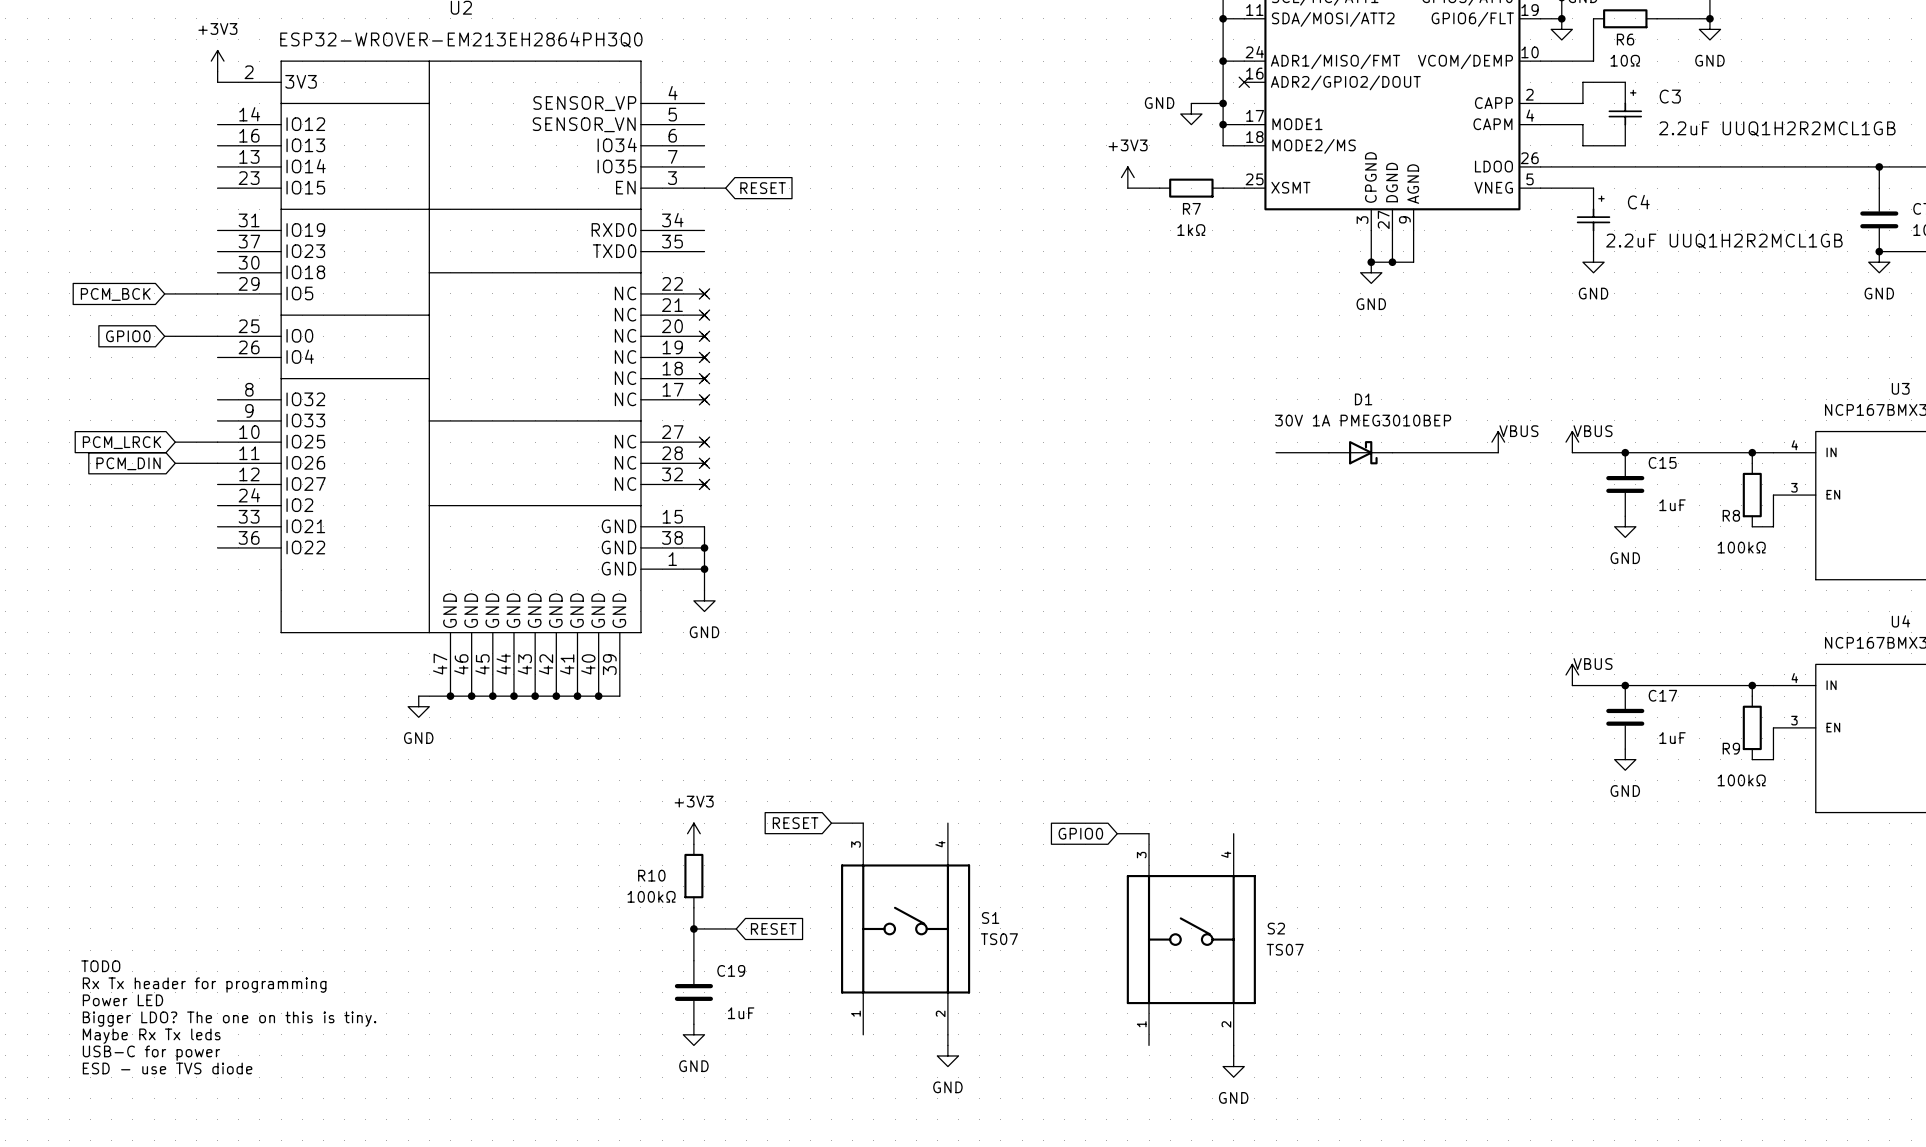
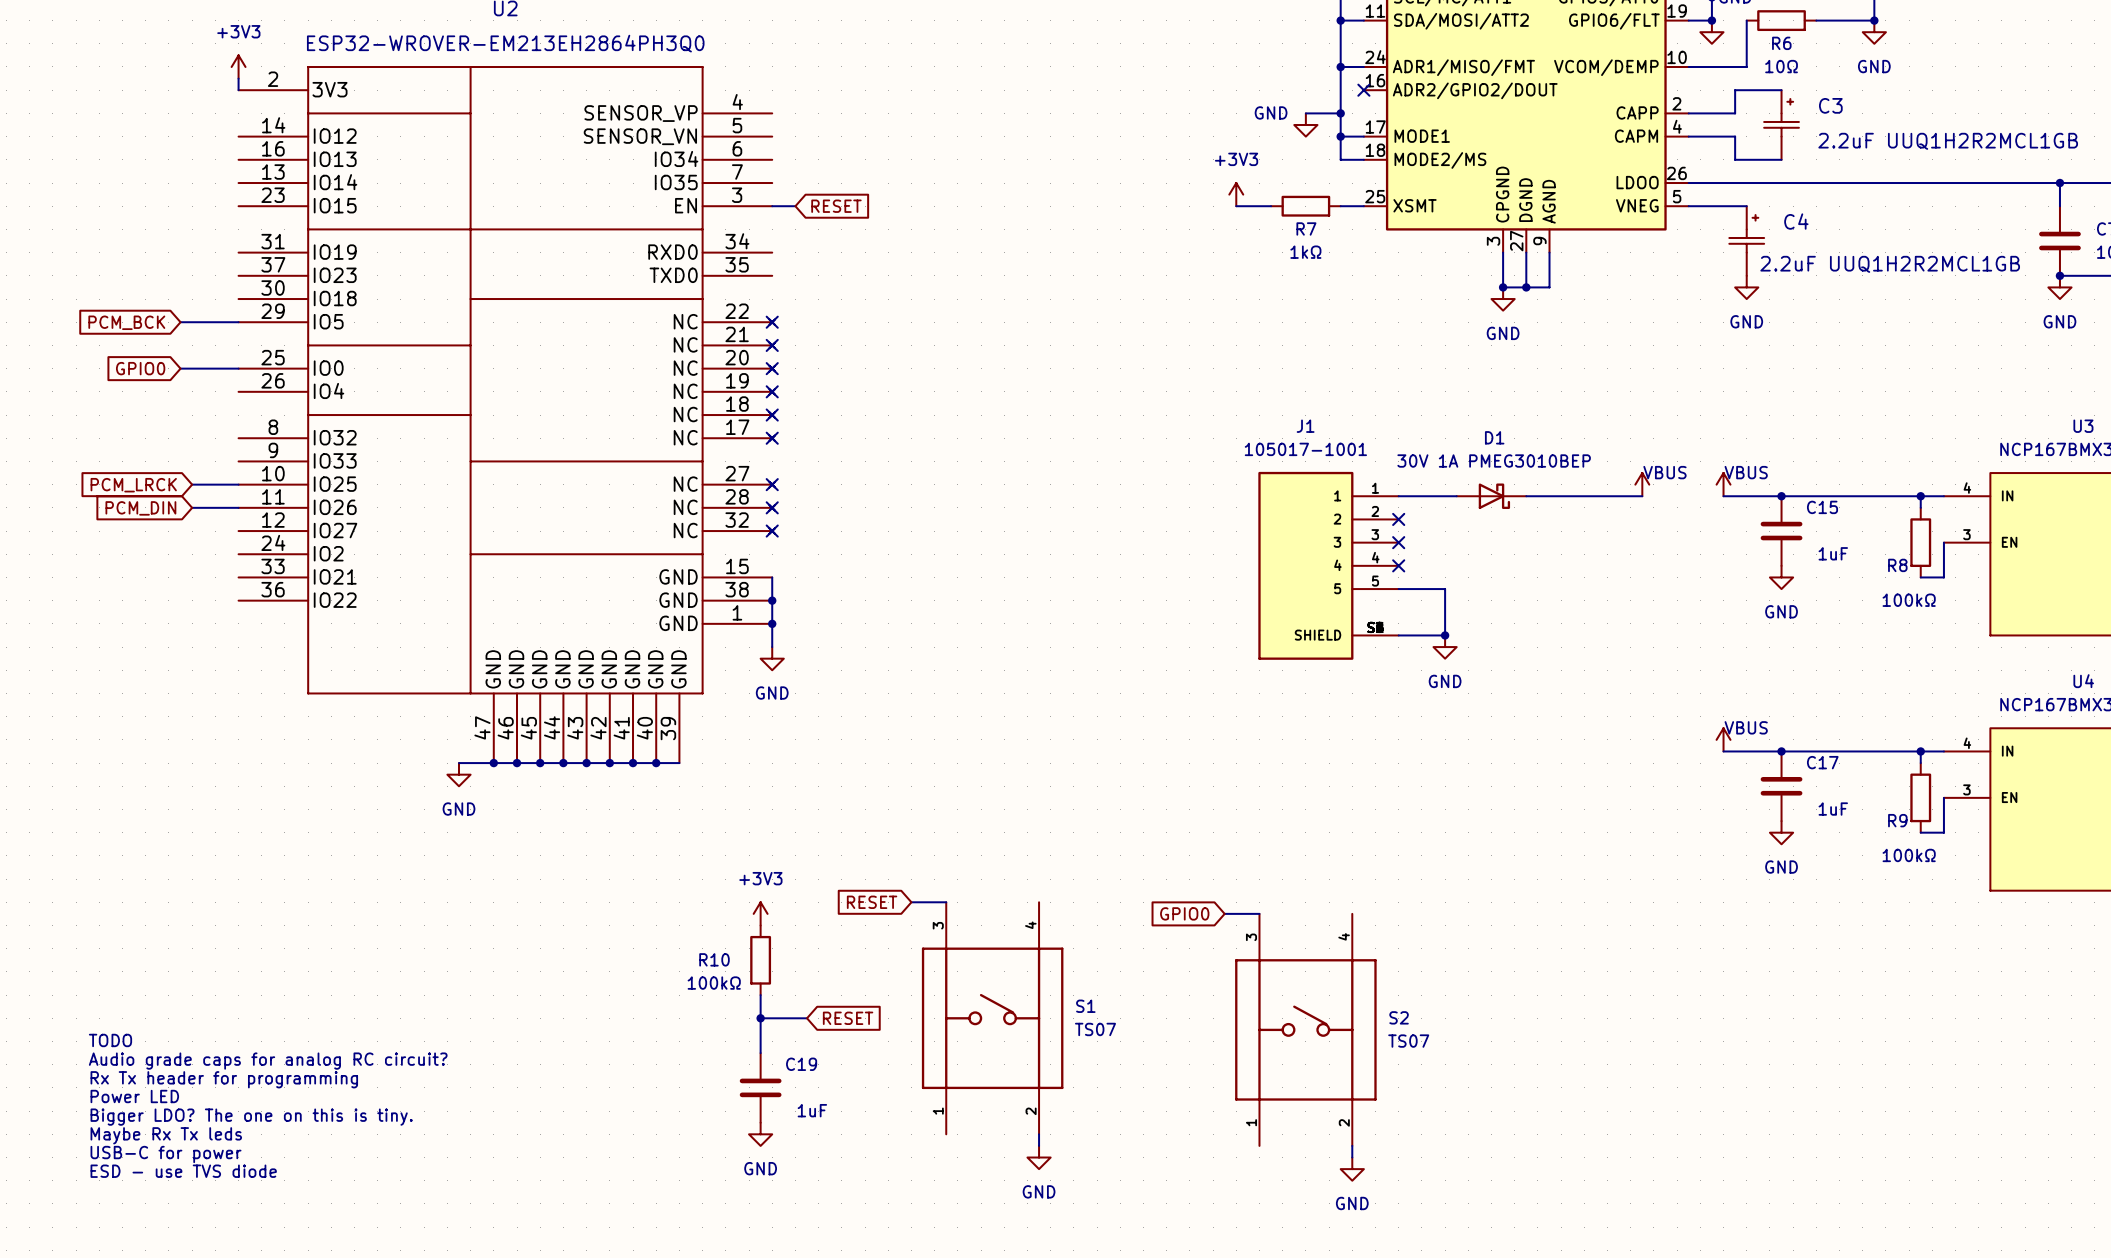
no-connect mark: none -> (1398, 519)
no-connect mark: none -> (1398, 542)
J1: none -> 105017-1001 (1328, 565)
no-connect mark: none -> (1398, 565)
wire: none -> (1398, 589) (1445, 589) (1445, 635) (1398, 635)
junction: none -> (1445, 635)
power symbol: none -> GND (1445, 647)
text: none -> TODO (110, 1040)
text: TODO (100, 966) -> Audio grade caps for analog RC circuit? (268, 1061)

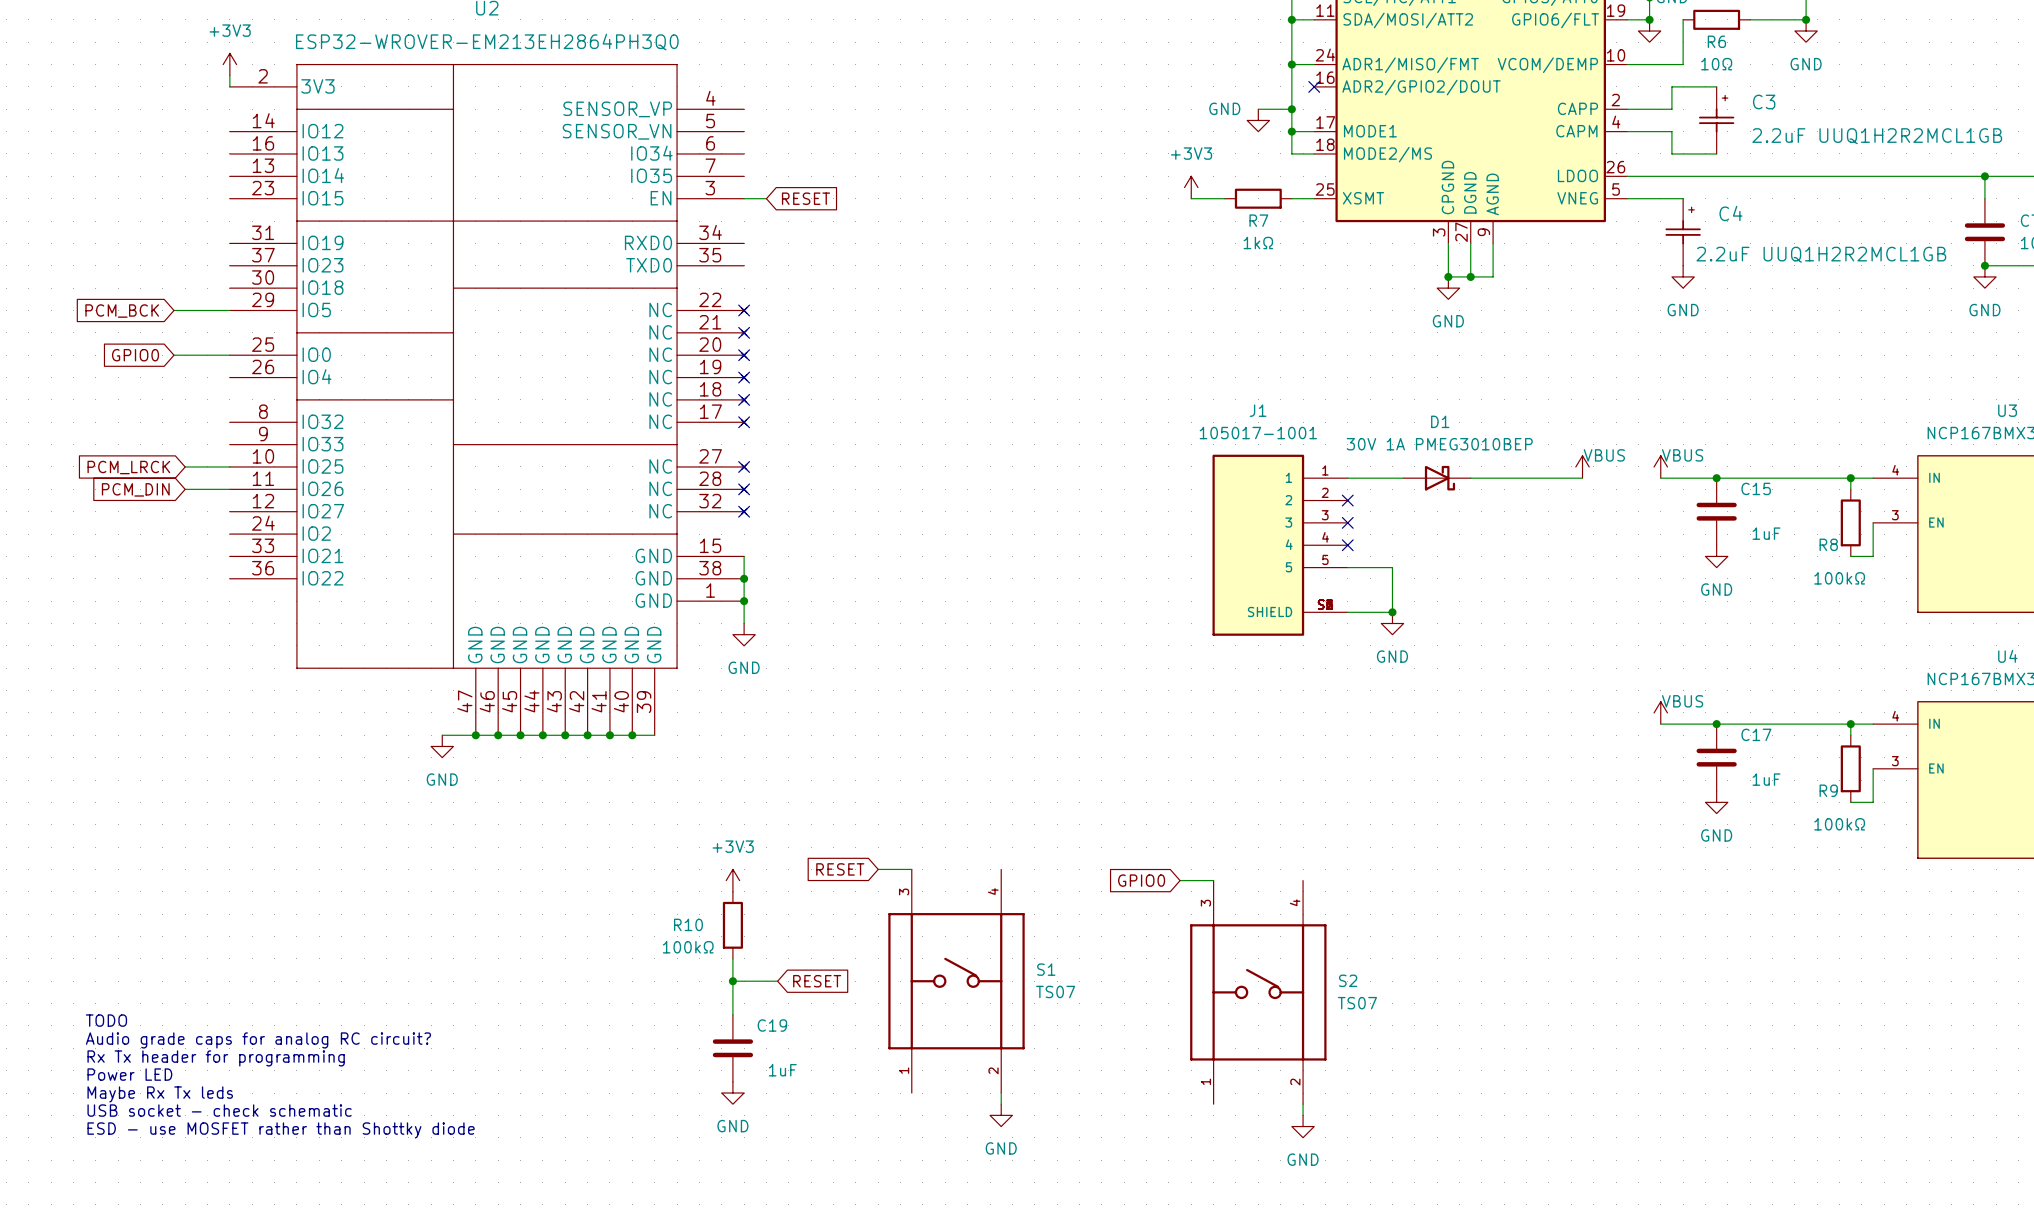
text: TODO (110, 1040) -> none
text: Audio grade caps for analog RC circuit? (268, 1061) -> TODO (106, 1020)
text: Rx Tx header for programming (224, 1079) -> Audio grade caps for analog RC circuit? (258, 1040)
text: Power LED (134, 1096) -> Rx Tx header for programming (216, 1058)
text: Bigger LDO? The one on this is tiny. (251, 1117) -> Power LED (129, 1074)
text: USB-C for power (166, 1154) -> USB socket - check schematic (219, 1110)
text: ESD - use TVS diode (183, 1171) -> ESD - use MOSFET rather than Shottky diode (281, 1130)

